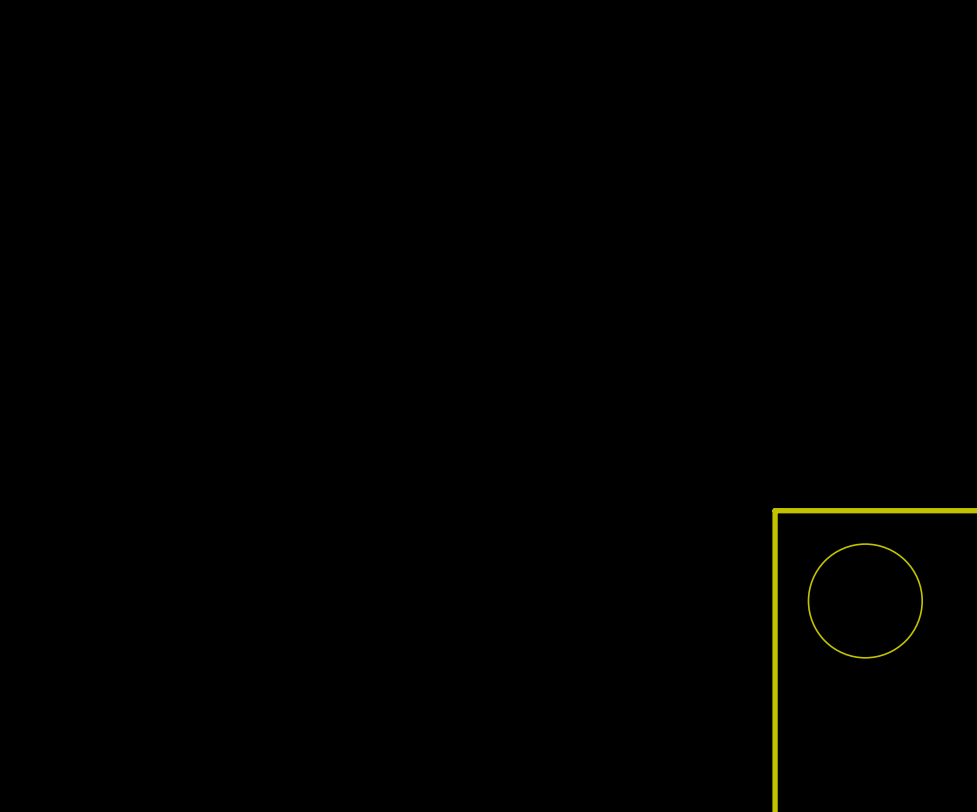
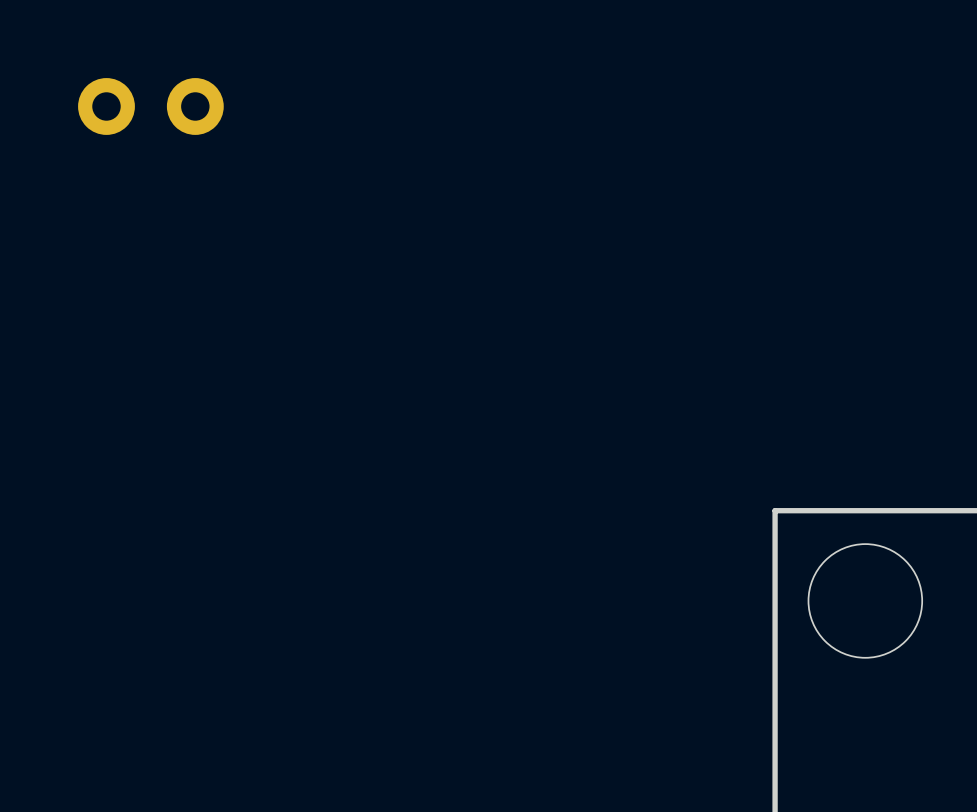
part: none -> (150, 106)

